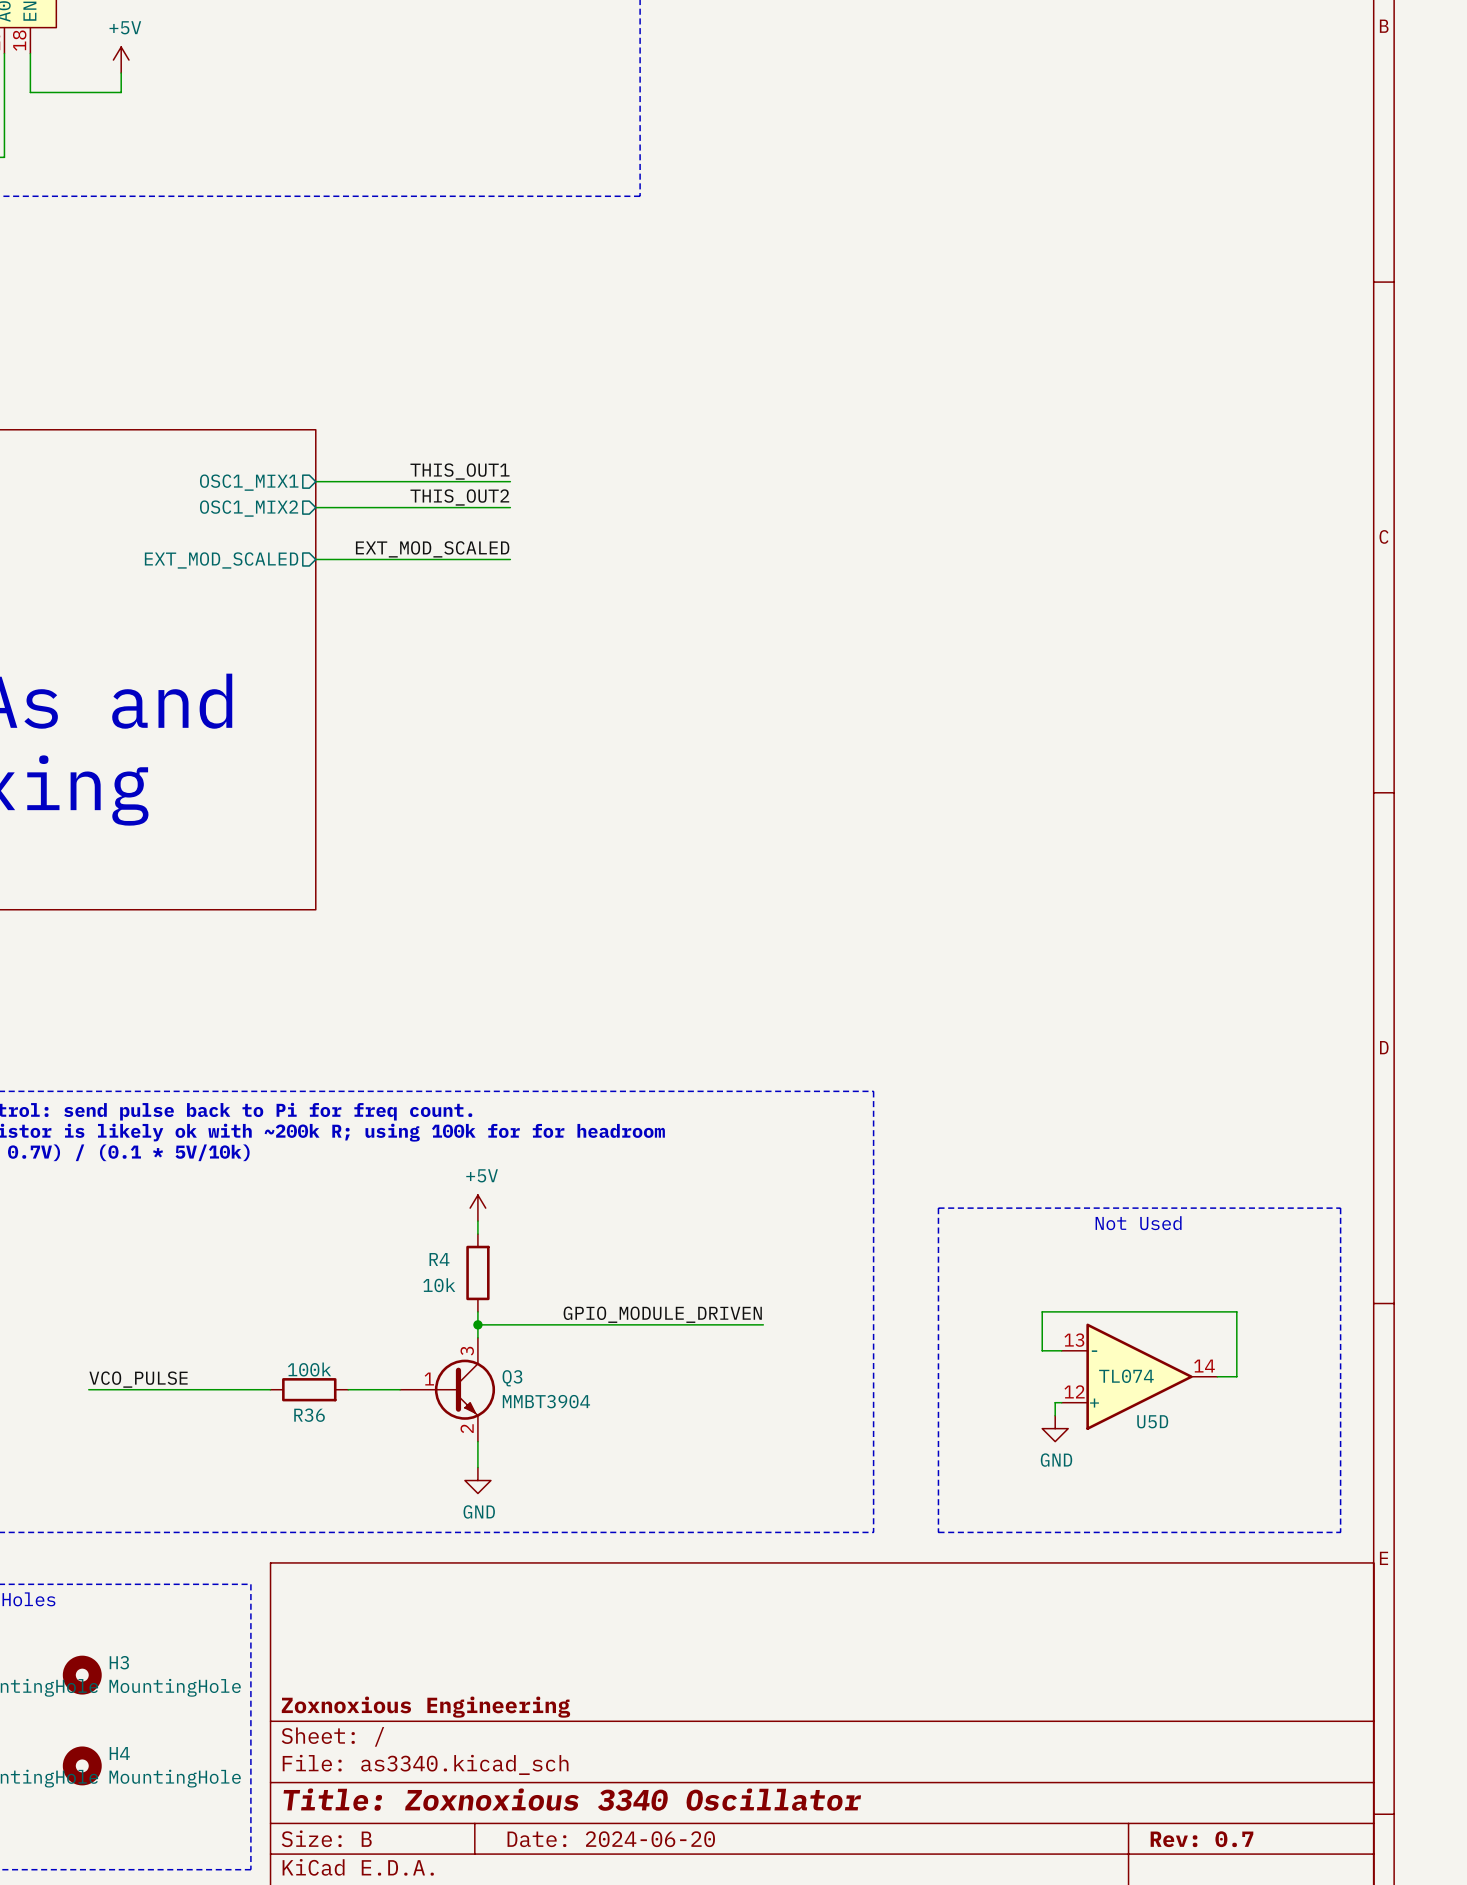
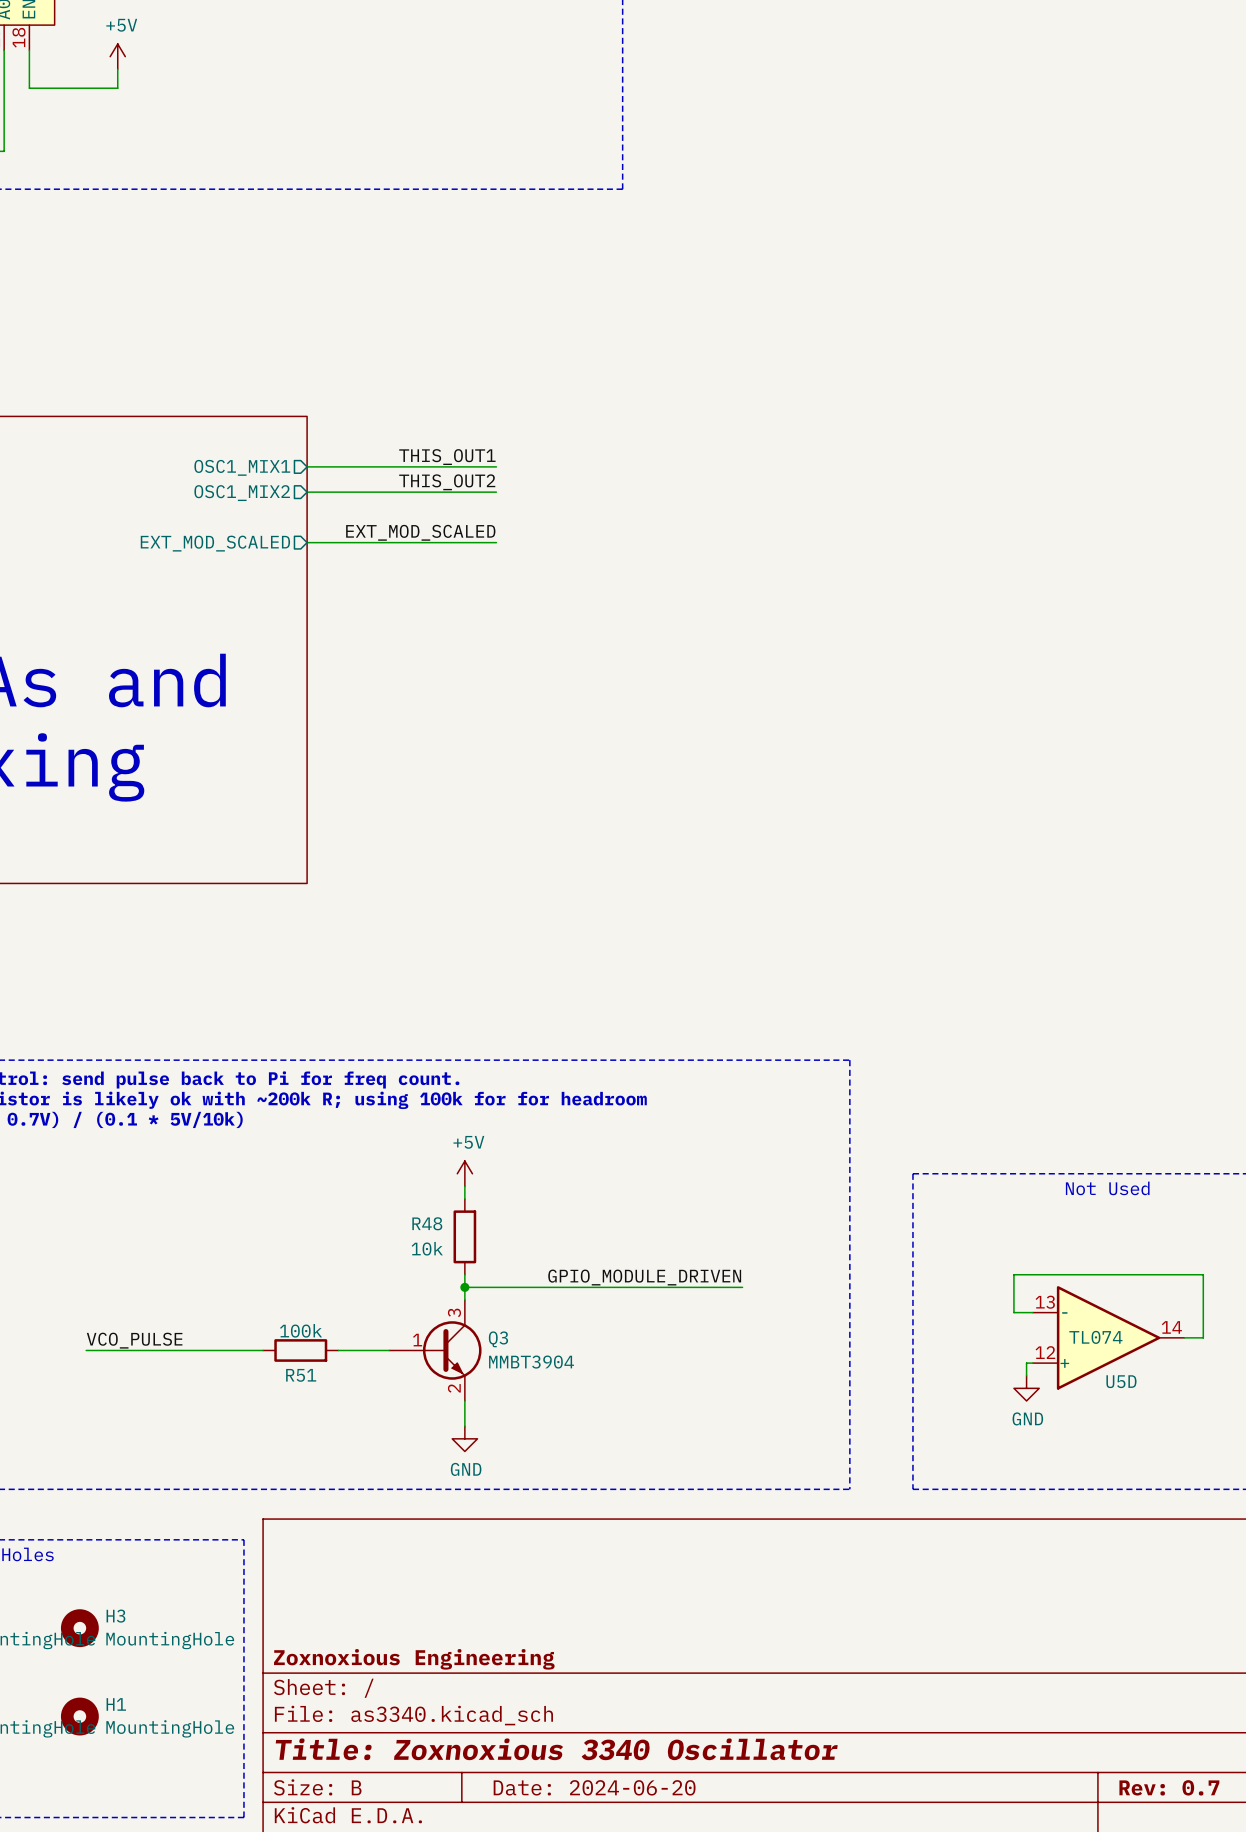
R4 name: R4 (439, 1259) -> R48 (427, 1223)
R36 name: R36 (309, 1415) -> R51 (301, 1375)
H4 name: H4 (119, 1753) -> H1 (116, 1704)

